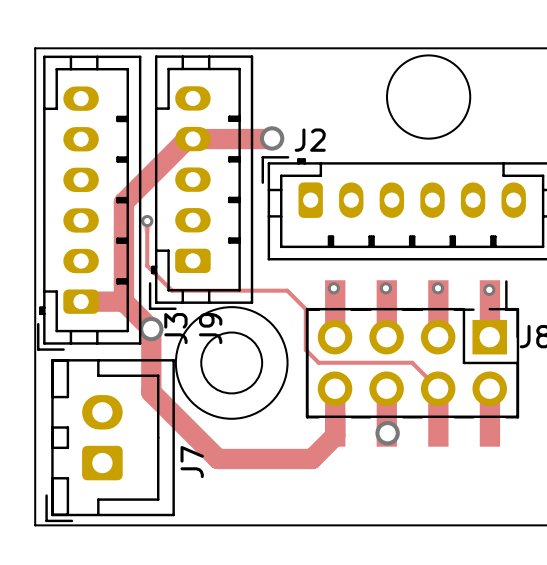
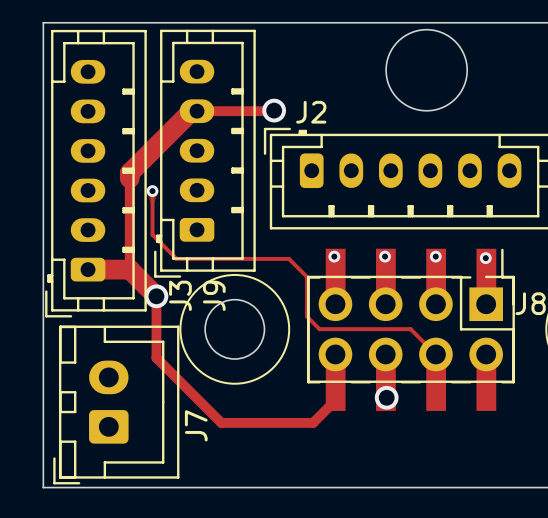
track width: thick (272, 138) (192, 139) -> thin (274, 110) (197, 111)
track width: thick (123, 208) (123, 301) -> thin (129, 178) (129, 269)
track width: thick (151, 329) (151, 392) (217, 458) (312, 458) (334, 436) -> thin (156, 296) (156, 358) (221, 422) (313, 422) (335, 400)

